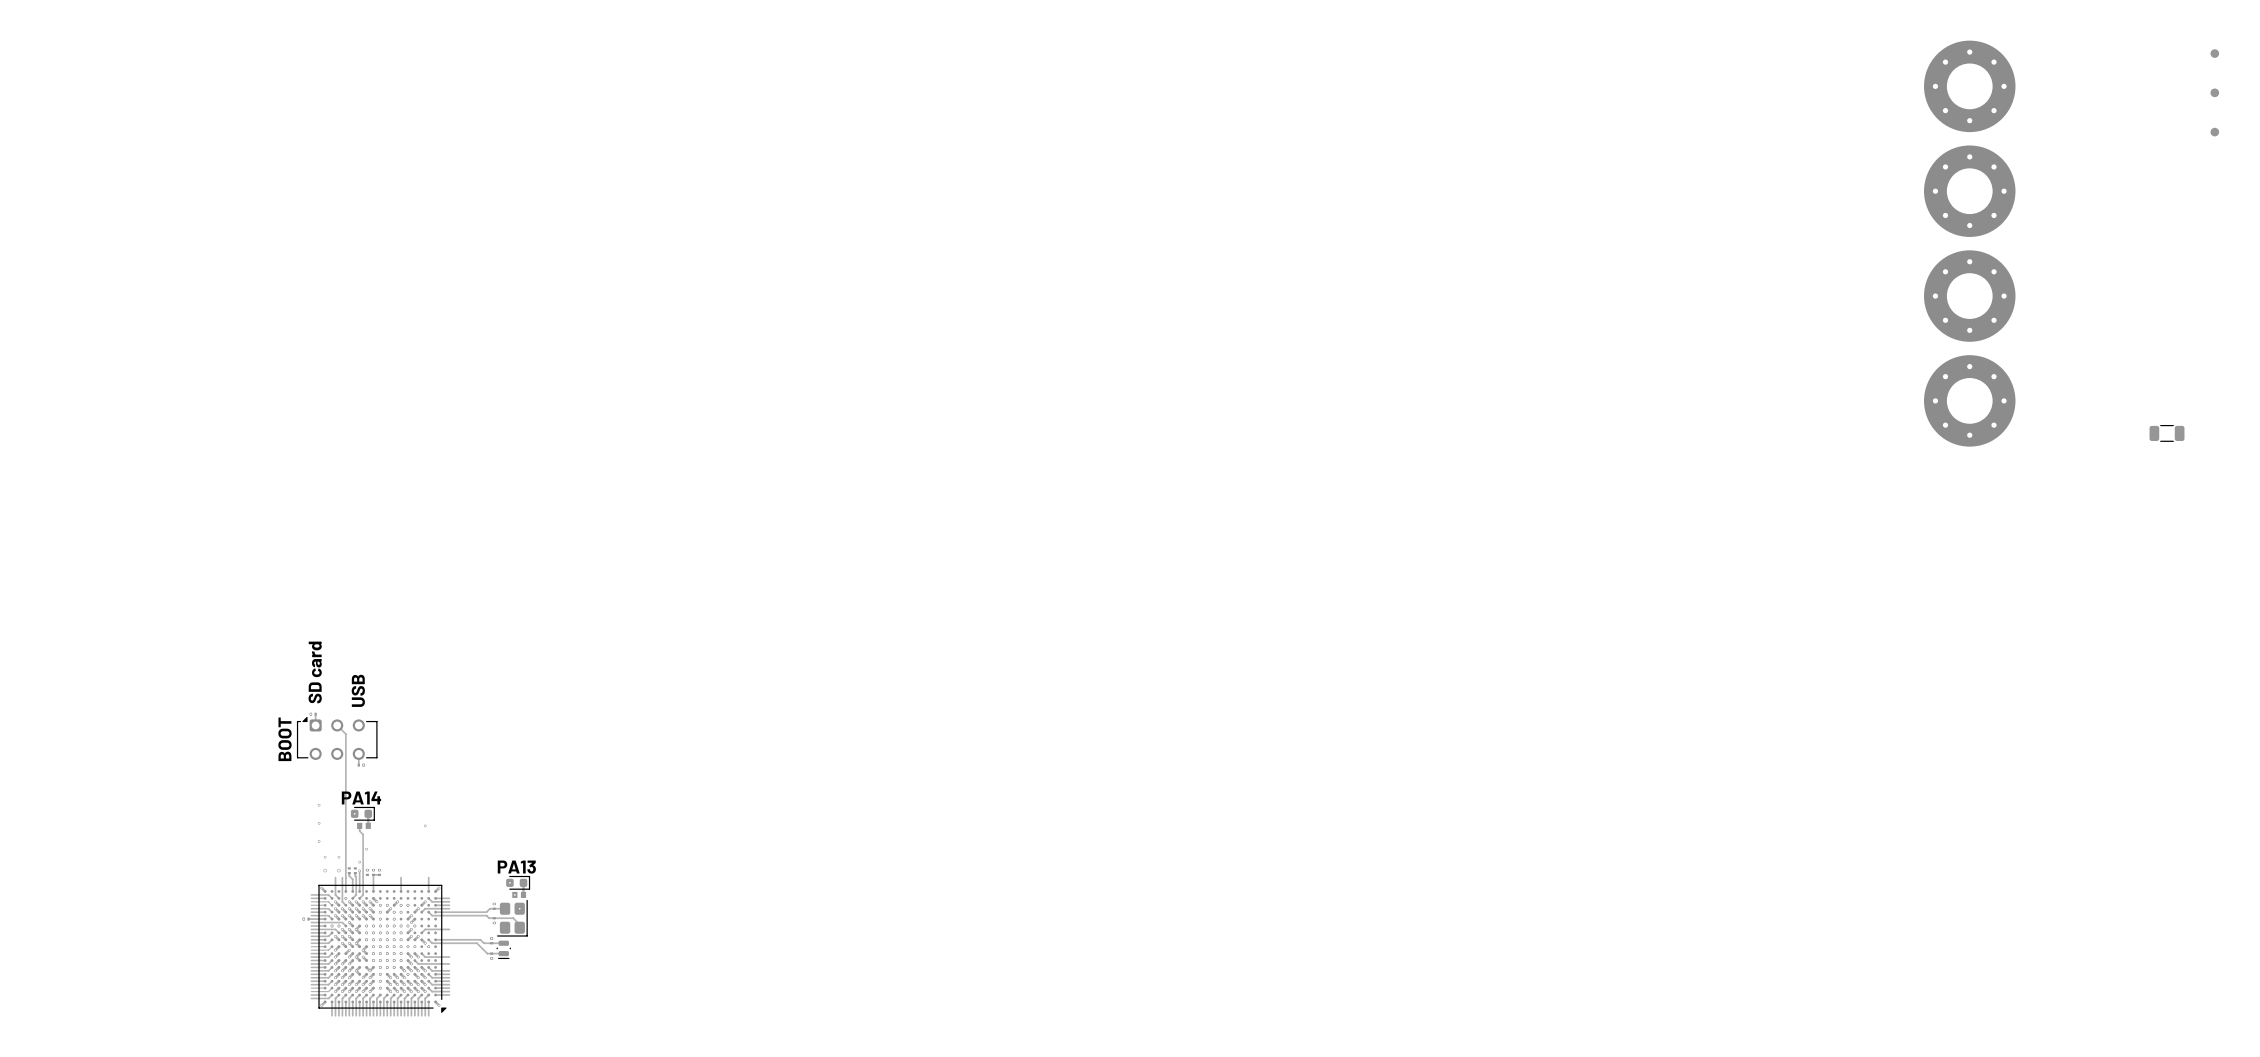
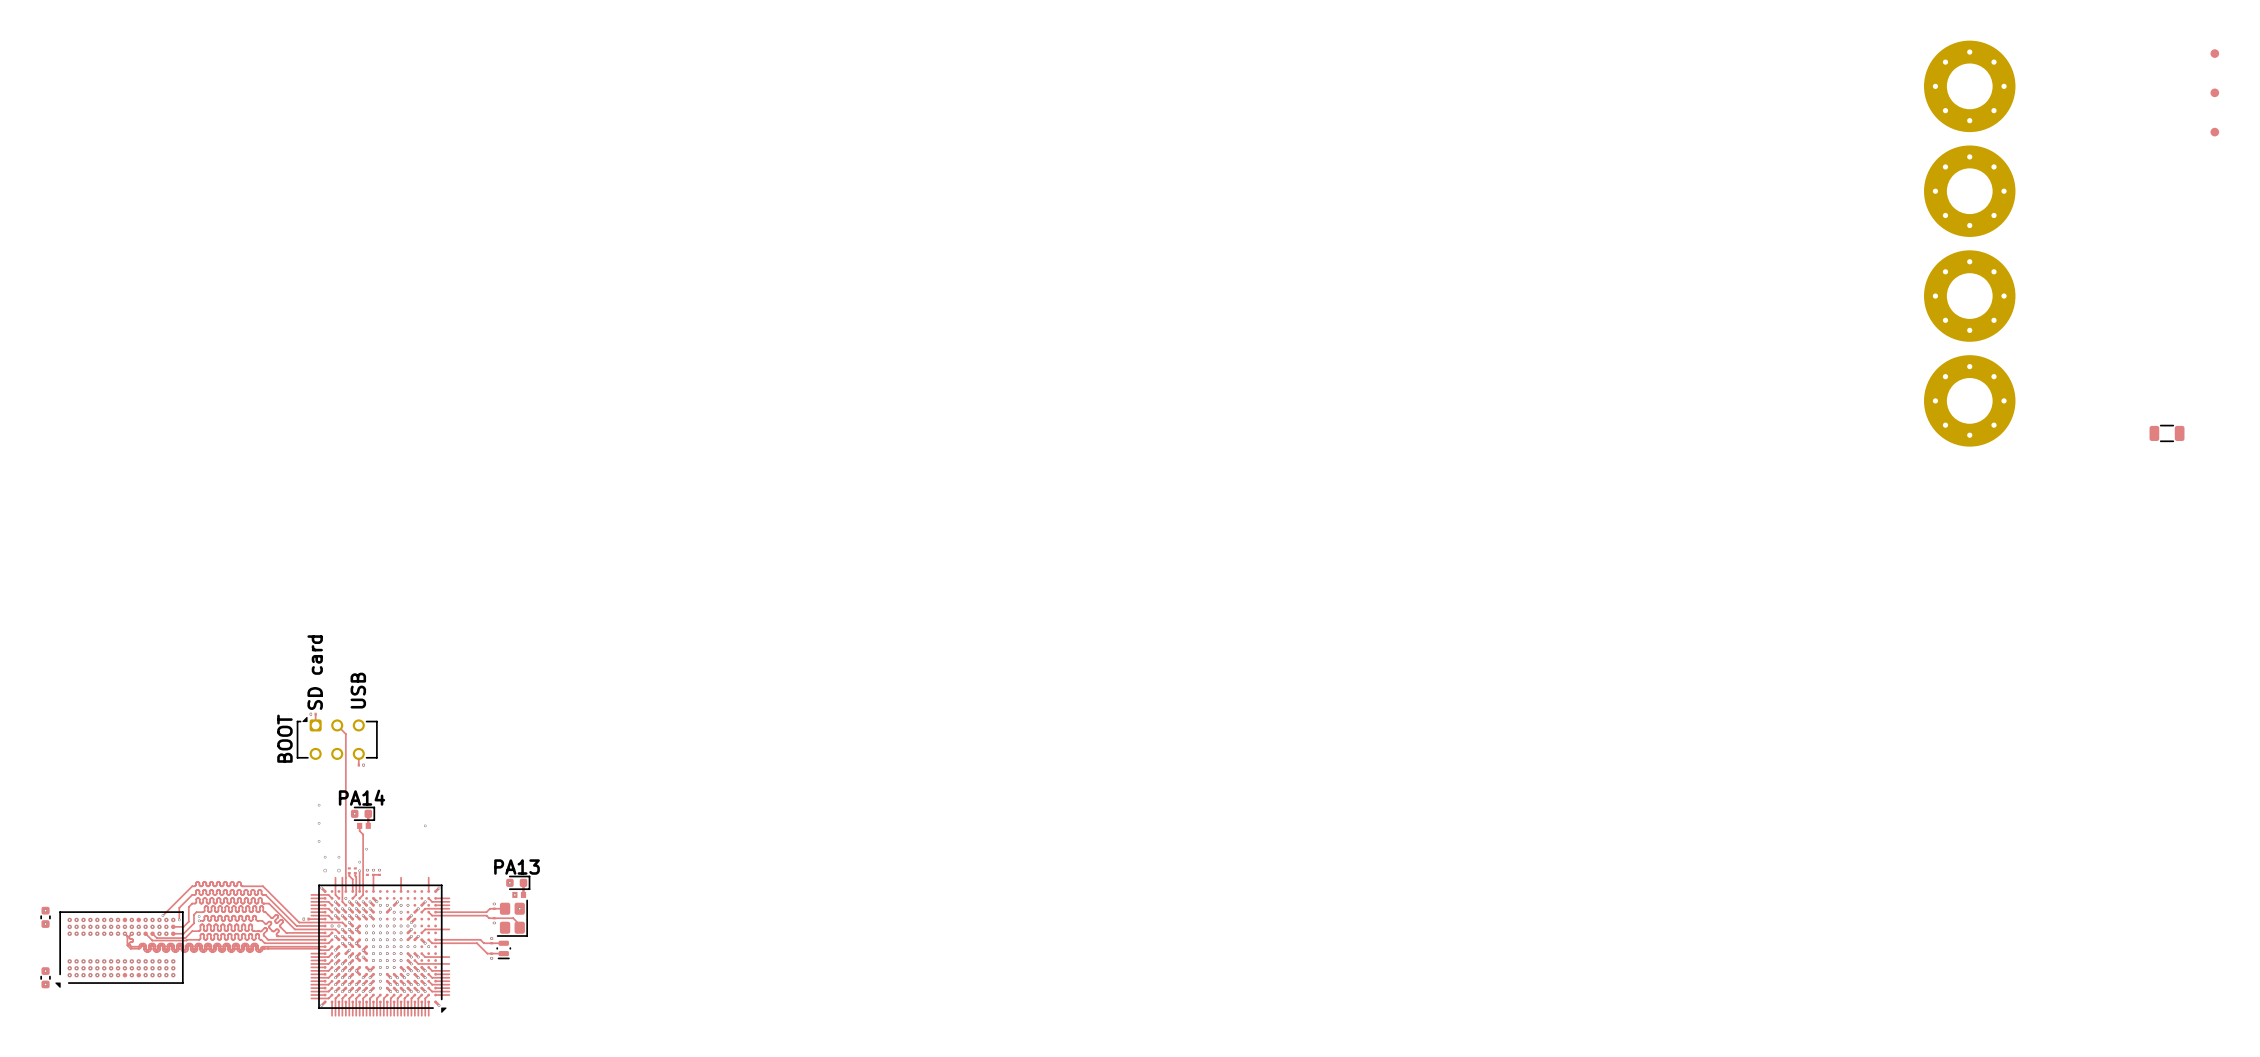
via: none -> (45, 910)
track: none -> (162, 915) (192, 886) (195, 885) (196, 882) (201, 886) (205, 882) (208, 886) (212, 882) (215, 886) (218, 882) (222, 886) (225, 882) (229, 886) (232, 882) (236, 886) (239, 882) (242, 886) (263, 886) (299, 922) (311, 922)
via: none -> (162, 915)
via: none -> (199, 916)
part: none -> (45, 917)
via: none -> (69, 919)
via: none -> (76, 919)
via: none -> (83, 919)
via: none -> (90, 919)
via: none -> (97, 919)
via: none -> (104, 919)
via: none -> (111, 919)
via: none -> (118, 919)
via: none -> (131, 919)
via: none -> (145, 919)
via: none -> (152, 919)
via: none -> (159, 919)
via: none -> (166, 919)
via: none -> (173, 919)
track: none -> (179, 919) (179, 907) (192, 894) (195, 894) (196, 890) (199, 890) (200, 894) (205, 890) (208, 894) (212, 890) (215, 894) (218, 889) (222, 894) (225, 889) (229, 894) (232, 889) (236, 894) (239, 889) (242, 894) (246, 889) (249, 894) (253, 889) (256, 894) (260, 889) (261, 894) (265, 894) (296, 925) (311, 925)
via: none -> (179, 919)
track: none -> (199, 920) (203, 920) (205, 915) (209, 920) (212, 915) (215, 920) (219, 915) (224, 920) (227, 915) (231, 920) (234, 915) (237, 920) (241, 915) (244, 920) (247, 915) (251, 920) (254, 915) (257, 920) (262, 920) (265, 923) (270, 921) (269, 927) (272, 931)
via: none -> (199, 920)
via: none -> (45, 924)
via: none -> (69, 926)
via: none -> (76, 926)
via: none -> (83, 926)
via: none -> (90, 926)
via: none -> (97, 926)
via: none -> (104, 926)
via: none -> (111, 926)
via: none -> (118, 926)
via: none -> (124, 926)
via: none -> (131, 926)
via: none -> (138, 926)
via: none -> (145, 926)
via: none -> (152, 926)
via: none -> (159, 926)
via: none -> (166, 926)
track: none -> (173, 926) (183, 926) (188, 921) (188, 907) (195, 903) (197, 898) (201, 903) (204, 898) (208, 903) (212, 898) (215, 903) (219, 898) (222, 903) (226, 898) (229, 903) (233, 898) (236, 903) (239, 898) (243, 903) (246, 898) (250, 903) (253, 898) (257, 903) (260, 898) (262, 903) (269, 903) (294, 929) (311, 929)
track: none -> (272, 931) (278, 929) (277, 936) (311, 936)
track: none -> (311, 932) (286, 932) (280, 926) (282, 920) (276, 922) (277, 915) (271, 917) (263, 911) (262, 906) (260, 906) (258, 912) (255, 906) (253, 906) (250, 912) (249, 906) (247, 906) (243, 912) (242, 906) (240, 906) (237, 912) (233, 906) (230, 912) (226, 906) (223, 912) (219, 906) (216, 912) (212, 906) (209, 912) (205, 906) (204, 911) (196, 912) (193, 914) (193, 923) (183, 933) (173, 933)
via: none -> (69, 933)
via: none -> (76, 933)
via: none -> (83, 933)
via: none -> (90, 933)
via: none -> (97, 933)
via: none -> (104, 933)
via: none -> (111, 933)
via: none -> (118, 933)
via: none -> (124, 933)
track: none -> (131, 933) (129, 938) (133, 941) (129, 944) (131, 946) (138, 946) (140, 943) (144, 943) (146, 949) (148, 949) (148, 945) (151, 943) (154, 944) (155, 949) (160, 943) (164, 944) (165, 949) (169, 943) (173, 944) (174, 949) (179, 943) (182, 944) (183, 949) (188, 943) (192, 944) (193, 949) (197, 943) (201, 944) (202, 949) (207, 943) (210, 944) (211, 949) (216, 943) (220, 944) (221, 949) (225, 943) (229, 944) (230, 949) (235, 943) (238, 944) (239, 949) (244, 943) (248, 944) (249, 949) (253, 943) (257, 944) (258, 949) (262, 946) (311, 946)
via: none -> (131, 933)
via: none -> (138, 933)
track: none -> (145, 933) (152, 940) (199, 939) (201, 933) (205, 939) (208, 933) (212, 939) (215, 933) (219, 939) (222, 933) (224, 934) (226, 939) (228, 934) (230, 934) (233, 939) (235, 934) (237, 933) (240, 939) (244, 933) (247, 939) (251, 933) (254, 939) (257, 933) (259, 939) (264, 943) (311, 943)
track: none -> (152, 933) (156, 938) (185, 938) (192, 931) (199, 930) (201, 924) (203, 925) (205, 931) (208, 924) (210, 924) (210, 930) (212, 931) (214, 925) (216, 924) (219, 931) (221, 925) (223, 924) (226, 931) (228, 925) (230, 924) (233, 931) (237, 924) (240, 931) (244, 924) (247, 931) (250, 924) (253, 931) (260, 931) (266, 928) (267, 930) (263, 934) (268, 939) (311, 939)
via: none -> (159, 933)
via: none -> (166, 933)
part: none -> (119, 949)
track: (311, 950) (320, 950) -> (124, 933) (127, 936) (127, 945) (130, 948) (139, 948) (143, 945) (146, 951) (150, 950) (151, 945) (155, 951) (159, 950) (160, 945) (165, 951) (168, 950) (169, 945) (174, 951) (178, 950) (179, 945) (183, 951) (187, 950) (188, 945) (193, 951) (196, 950) (197, 945) (202, 951) (206, 950) (207, 945) (211, 951) (215, 950) (216, 945) (221, 951) (224, 950) (225, 945) (230, 951) (234, 950) (235, 945) (239, 951) (243, 950) (244, 945) (249, 951) (252, 950) (253, 945) (255, 945) (258, 951) (263, 948) (320, 950)
via: none -> (69, 961)
via: none -> (76, 961)
via: none -> (83, 961)
via: none -> (90, 961)
via: none -> (97, 961)
via: none -> (104, 961)
via: none -> (111, 961)
via: none -> (118, 961)
via: none -> (124, 961)
via: none -> (131, 961)
via: none -> (138, 961)
via: none -> (145, 961)
via: none -> (152, 961)
via: none -> (159, 961)
via: none -> (166, 961)
via: none -> (173, 961)
via: none -> (69, 968)
via: none -> (76, 968)
via: none -> (83, 968)
via: none -> (90, 968)
via: none -> (97, 968)
via: none -> (104, 968)
via: none -> (111, 968)
via: none -> (118, 968)
via: none -> (124, 968)
via: none -> (131, 968)
via: none -> (138, 968)
via: none -> (145, 968)
via: none -> (152, 968)
via: none -> (159, 968)
via: none -> (166, 968)
via: none -> (173, 968)
via: none -> (45, 971)
via: none -> (69, 975)
via: none -> (76, 975)
via: none -> (83, 975)
via: none -> (90, 975)
via: none -> (97, 975)
via: none -> (104, 975)
via: none -> (111, 975)
via: none -> (118, 975)
via: none -> (131, 975)
via: none -> (145, 975)
via: none -> (152, 975)
via: none -> (159, 975)
via: none -> (166, 975)
via: none -> (173, 975)
part: none -> (45, 977)
via: none -> (45, 984)

